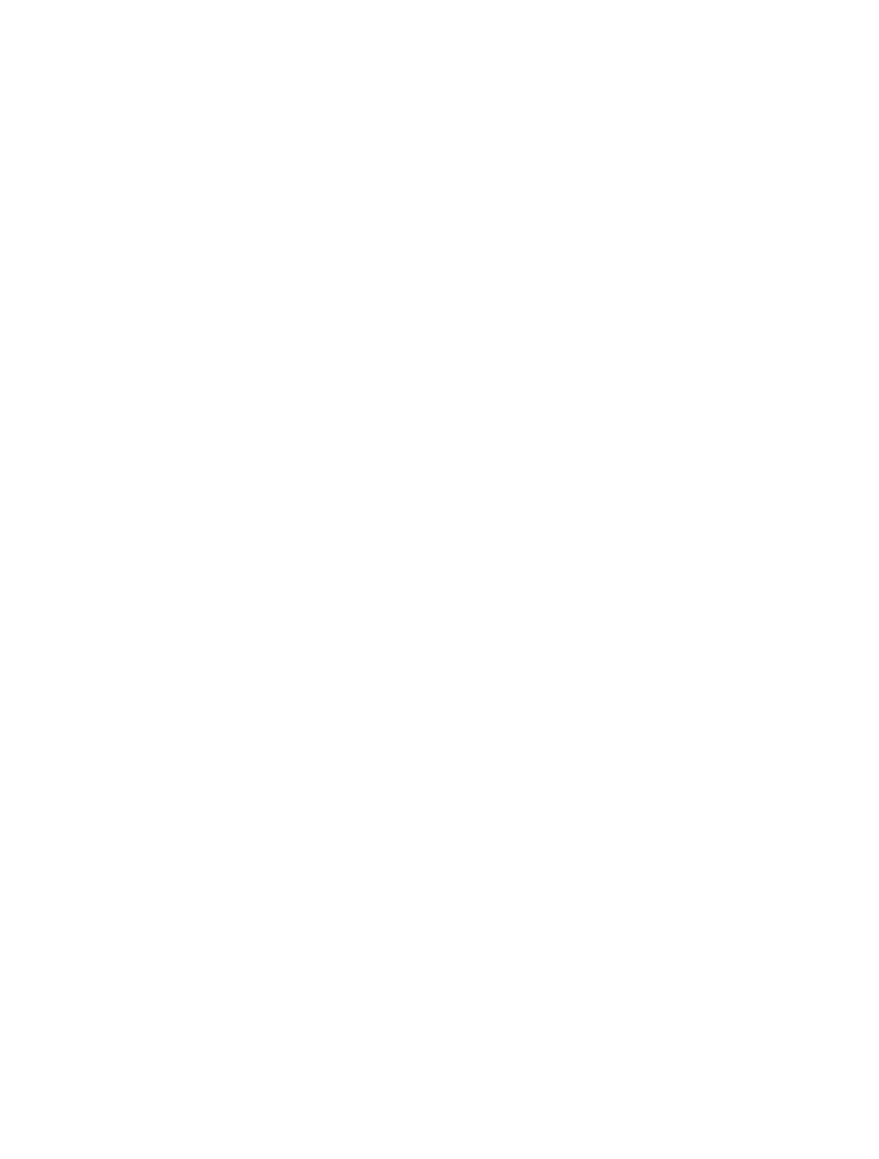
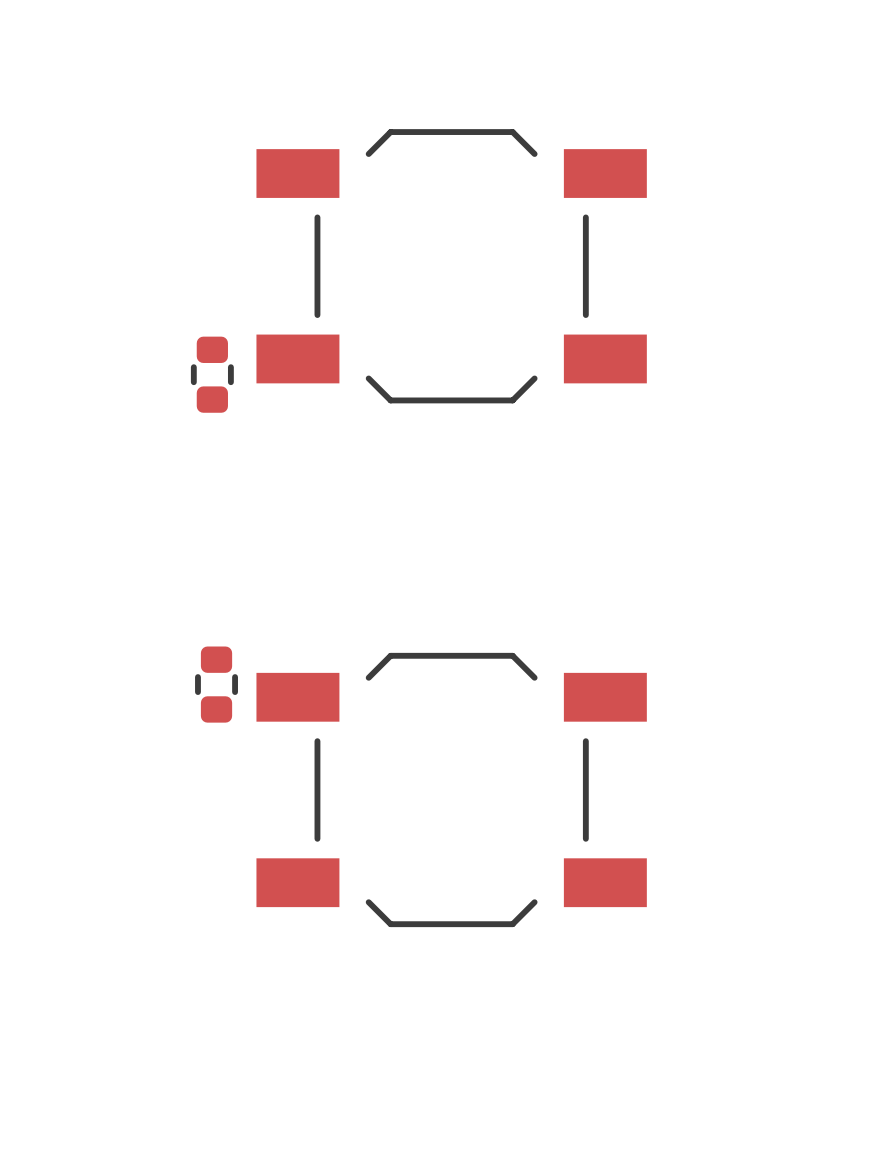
part: none -> (451, 266)
part: none -> (212, 374)
part: none -> (216, 684)
part: none -> (451, 789)

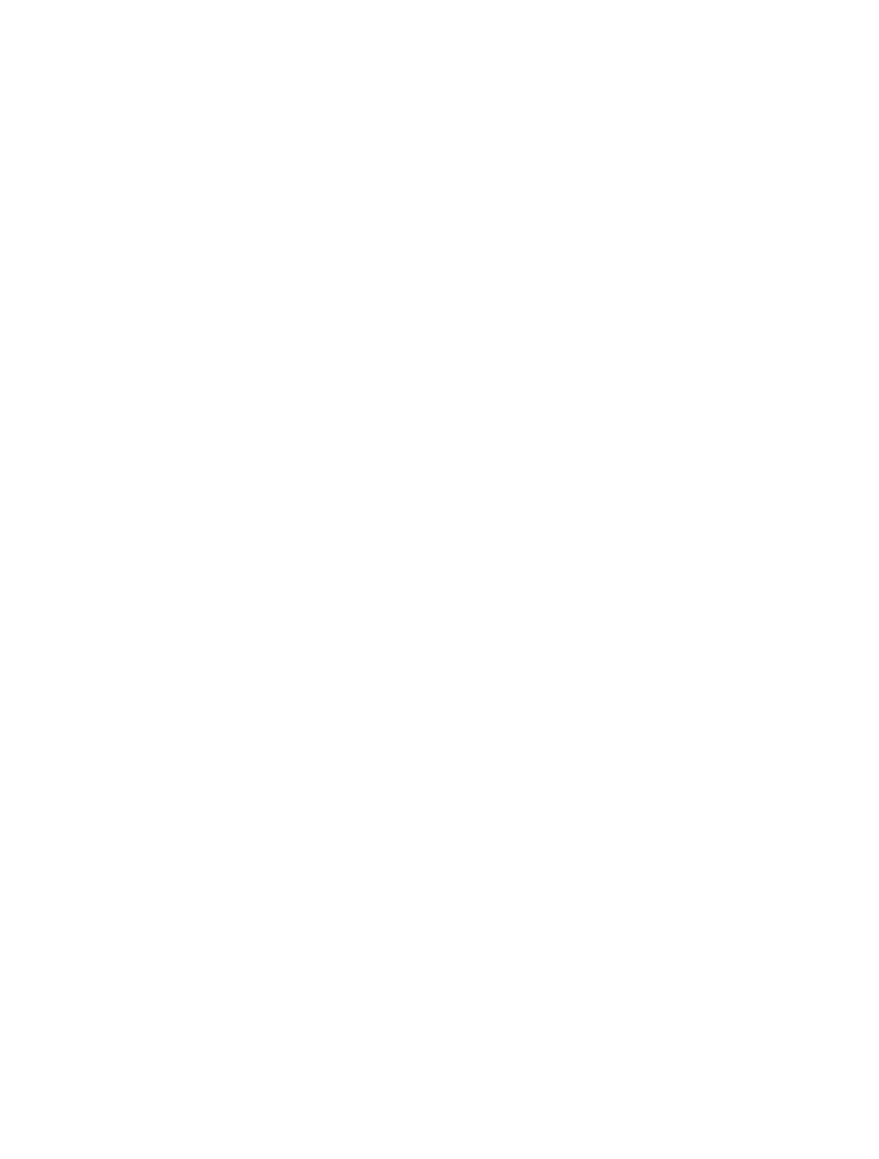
part: (451, 266) -> none
part: (212, 374) -> none
part: (216, 684) -> none
part: (451, 789) -> none

